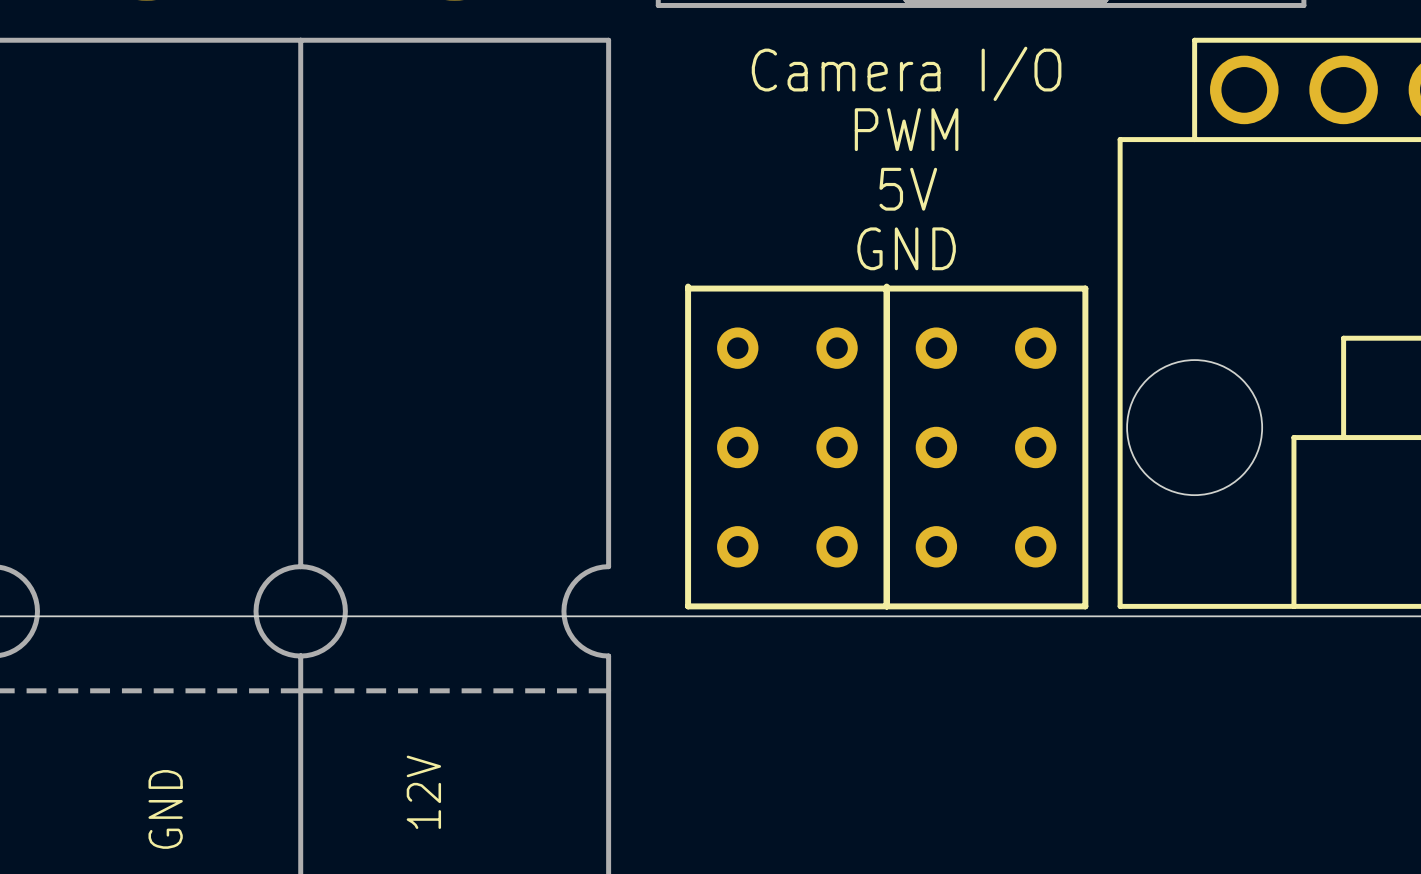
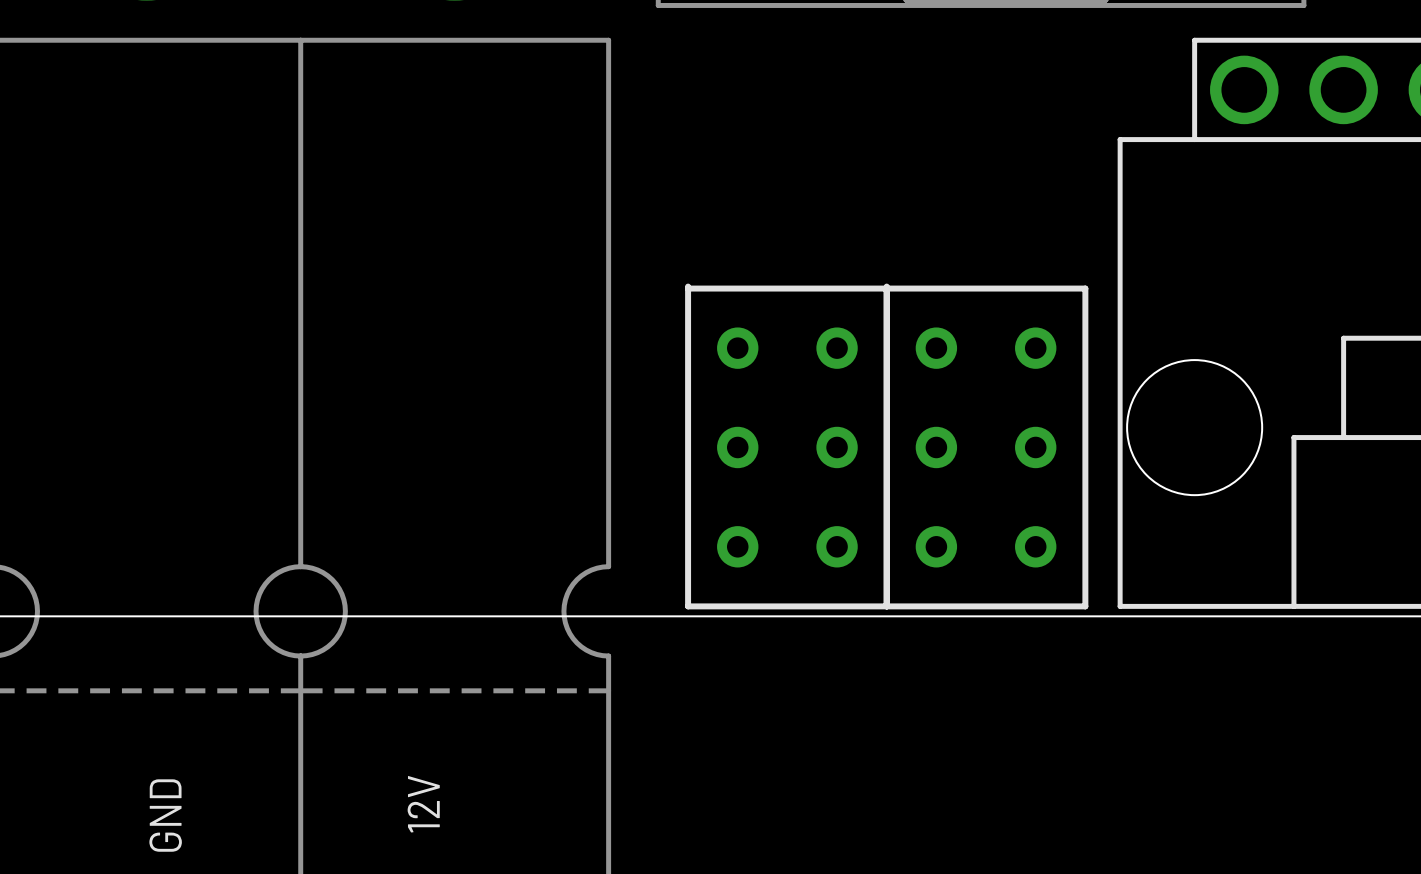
text: Camera I/O (906, 73) -> none
text: PWM (906, 129) -> none
text: 5V (908, 189) -> none
text: GND (906, 248) -> none

